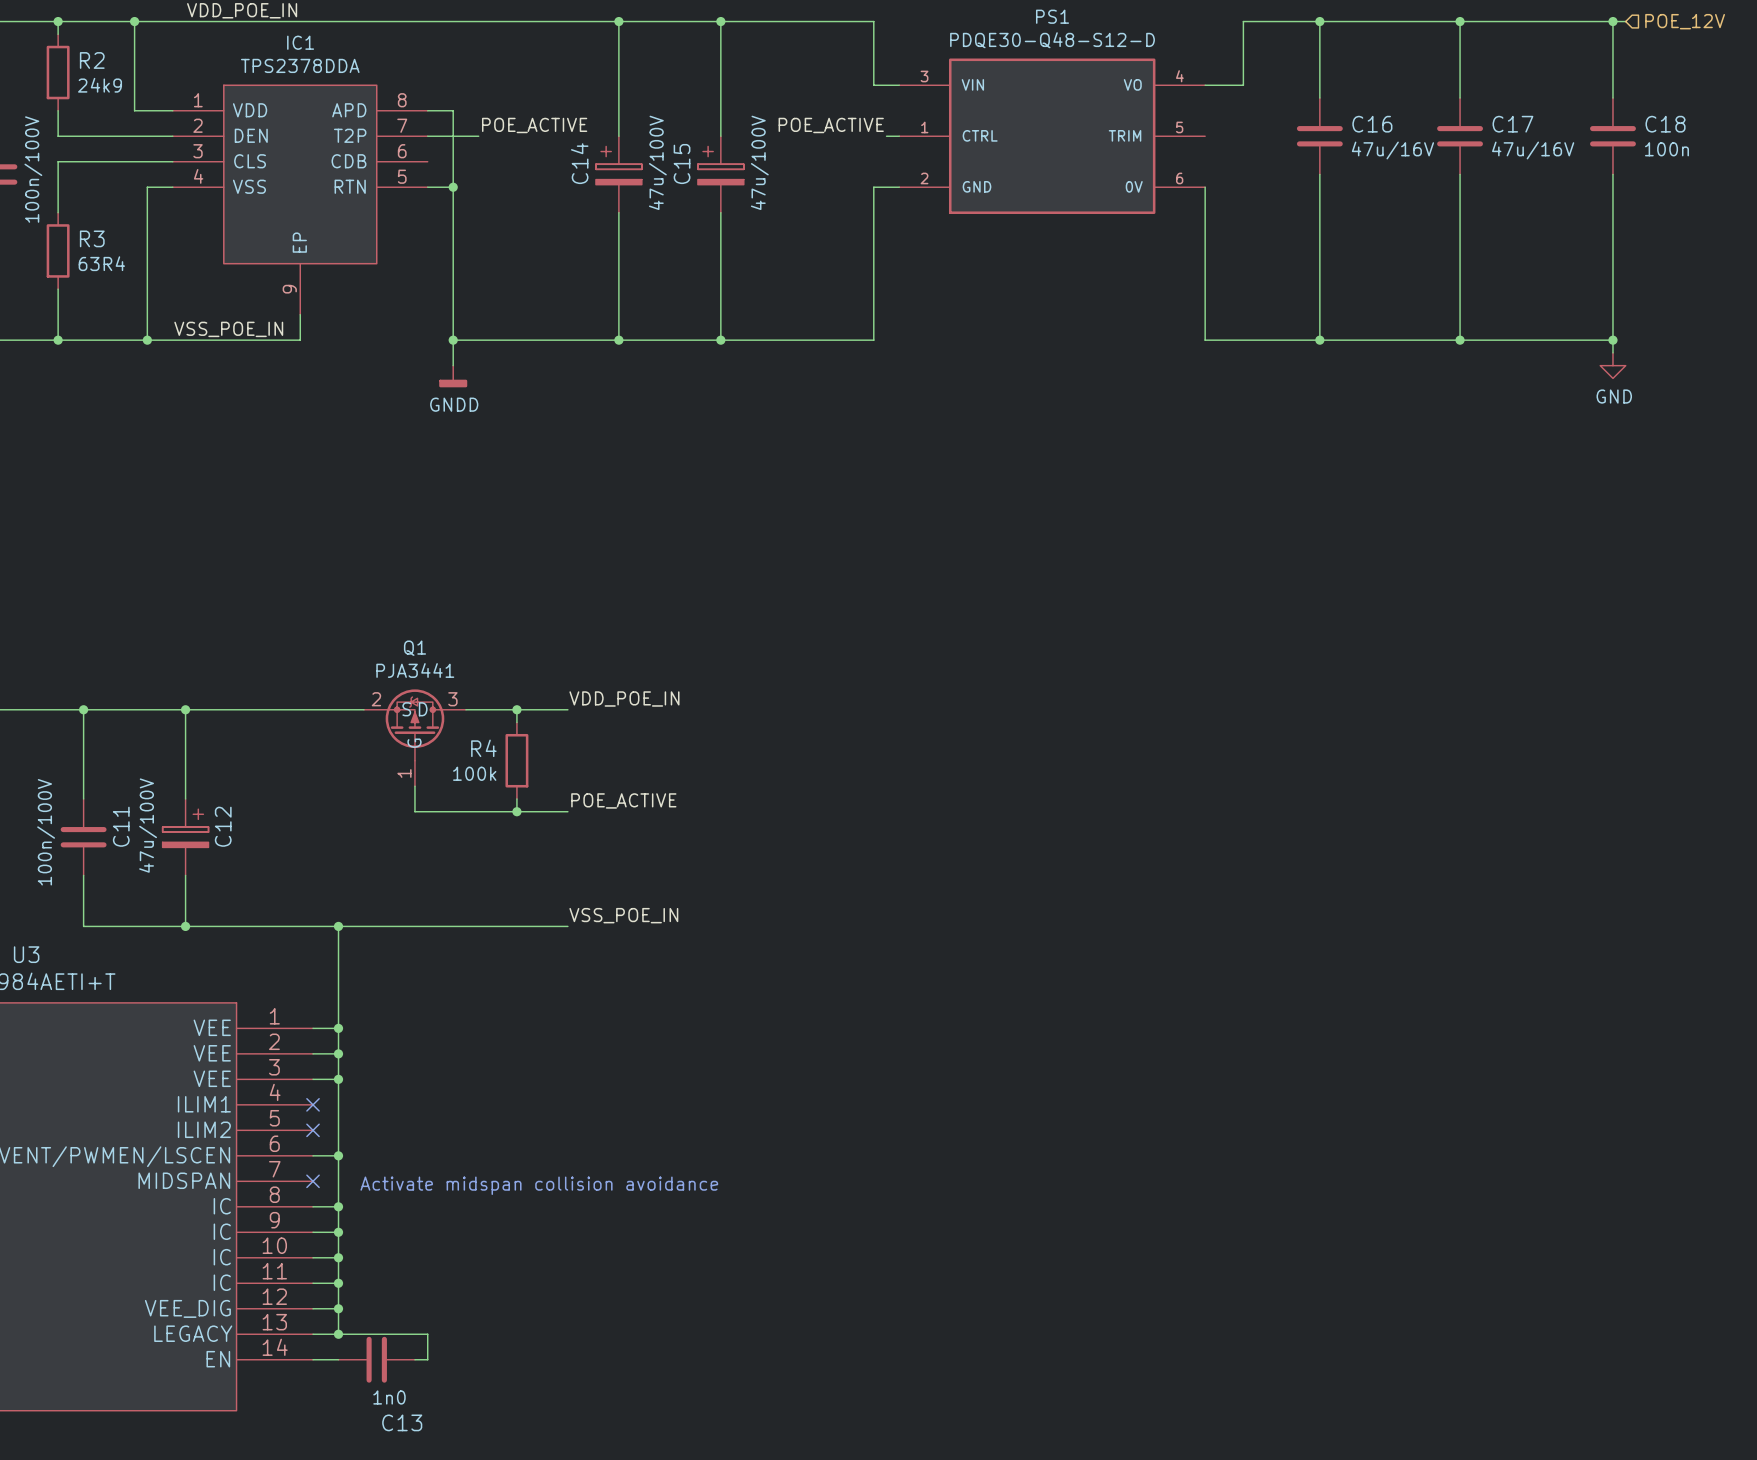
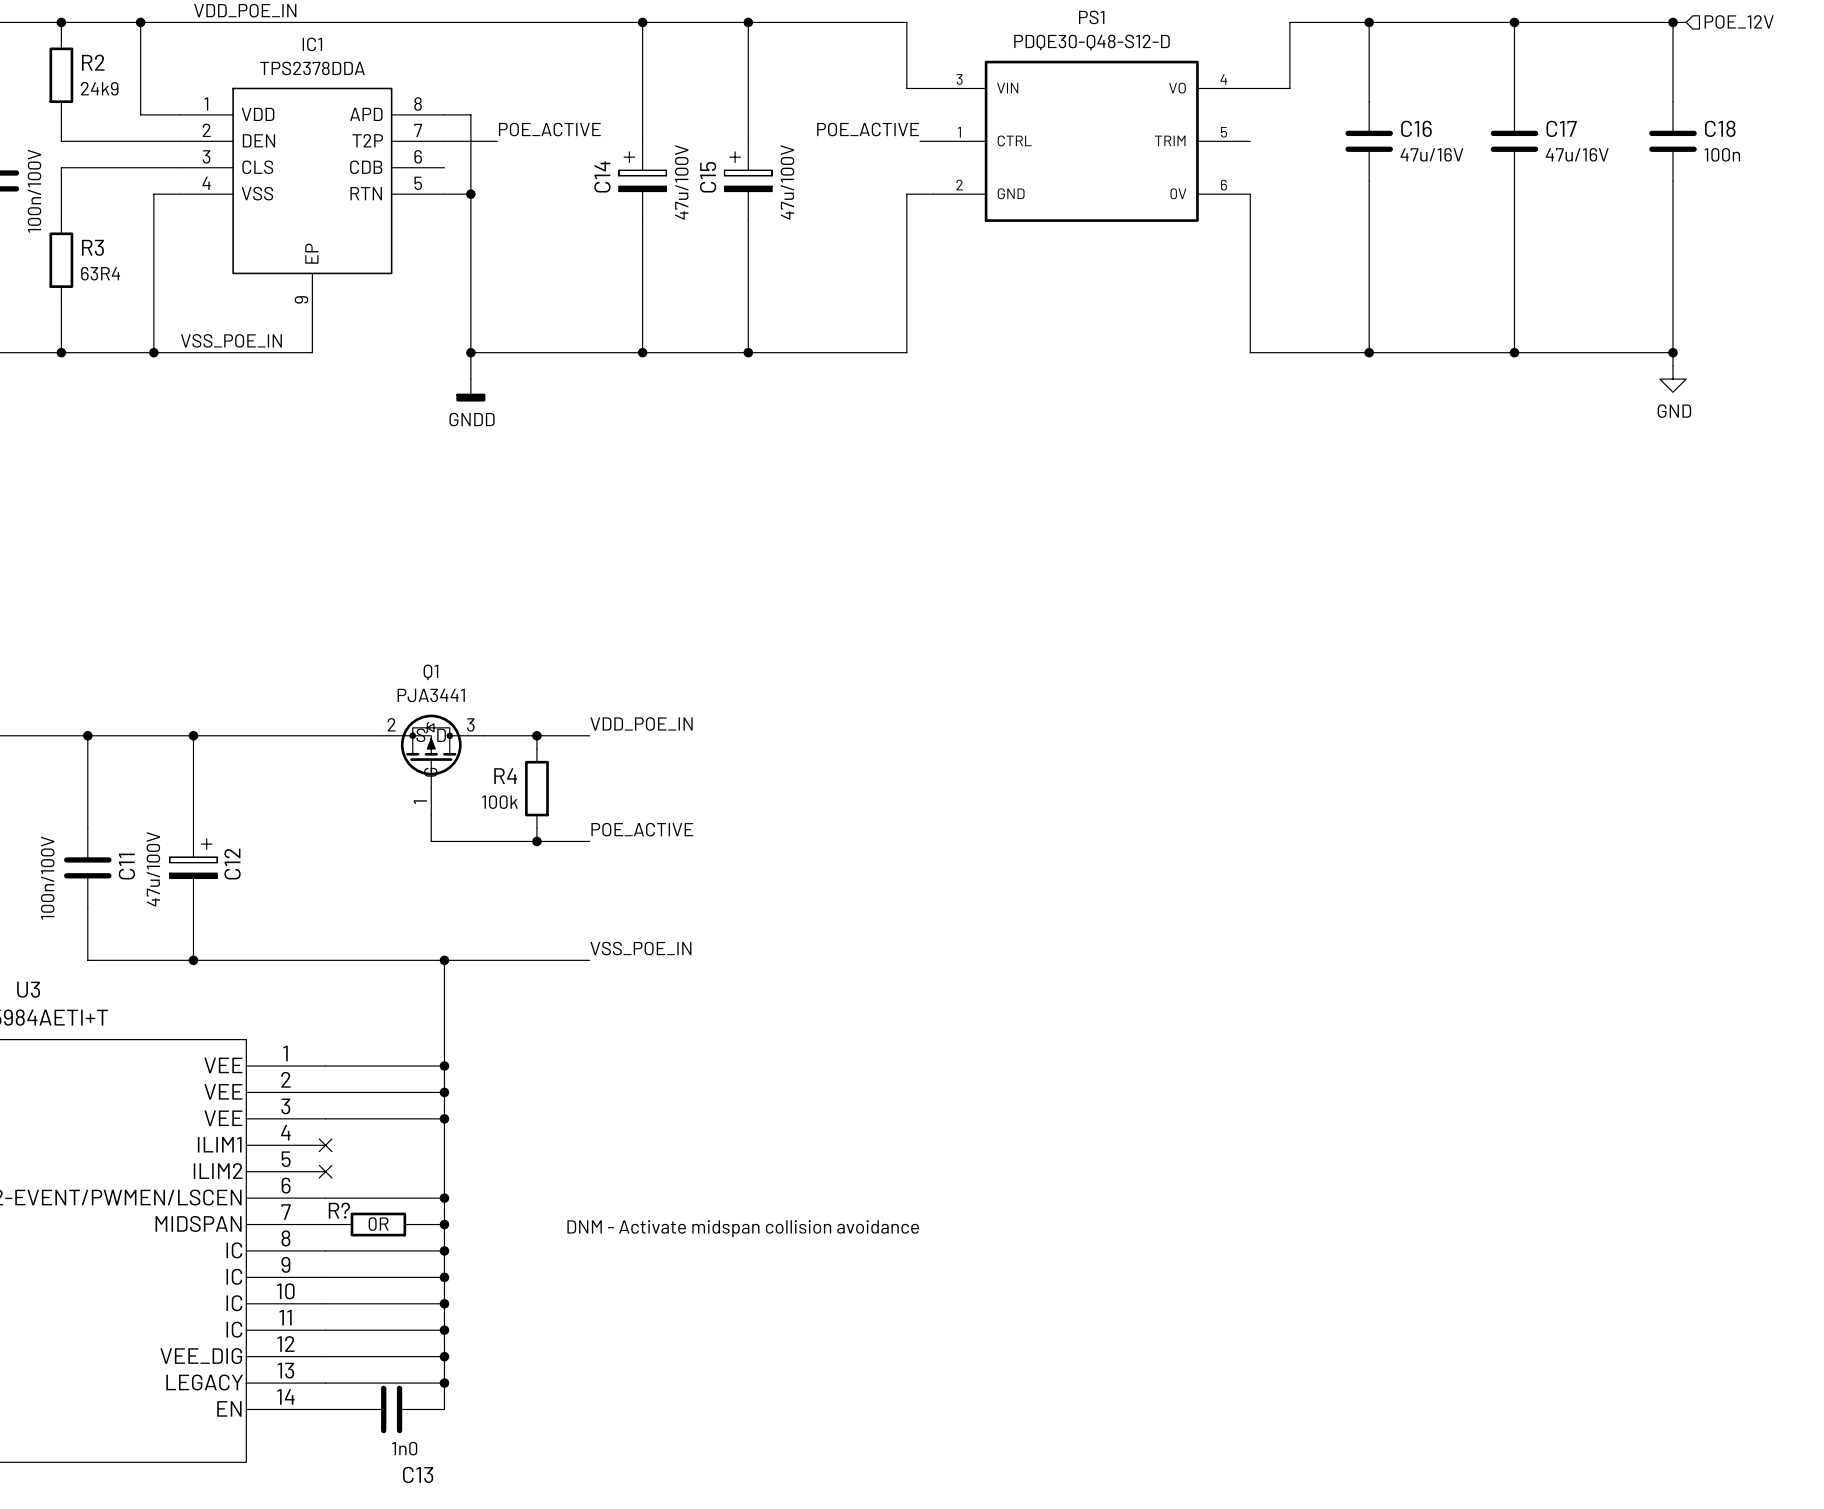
wire: (338, 926) (338, 1334) -> (444, 960) (444, 1383)
junction: (338, 926) -> none
junction: none -> (444, 960)
wire: none -> (352, 1066) (444, 1066)
junction: (338, 1028) -> none
junction: none -> (444, 1066)
wire: none -> (352, 1092) (444, 1092)
junction: (338, 1053) -> none
junction: none -> (444, 1092)
wire: none -> (352, 1118) (444, 1118)
junction: (338, 1079) -> none
junction: none -> (444, 1118)
wire: none -> (352, 1198) (444, 1198)
junction: (338, 1155) -> none
junction: none -> (444, 1198)
wire: none -> (325, 1224) (338, 1224)
no-connect mark: (313, 1181) -> none
R?: none -> (378, 1224)
wire: none -> (418, 1224) (444, 1224)
junction: none -> (444, 1224)
text: Activate midspan collision avoidance (539, 1185) -> DNM - Activate midspan collision avoidance (743, 1228)
wire: none -> (352, 1250) (444, 1250)
junction: (338, 1206) -> none
junction: none -> (444, 1250)
wire: none -> (352, 1277) (444, 1277)
junction: (338, 1232) -> none
junction: none -> (444, 1277)
wire: none -> (352, 1303) (444, 1303)
junction: (338, 1257) -> none
junction: none -> (444, 1303)
wire: none -> (352, 1330) (444, 1330)
junction: (338, 1283) -> none
junction: none -> (444, 1330)
wire: none -> (352, 1356) (444, 1356)
junction: (338, 1308) -> none
junction: none -> (444, 1356)
junction: (338, 1334) -> none
junction: none -> (444, 1383)

